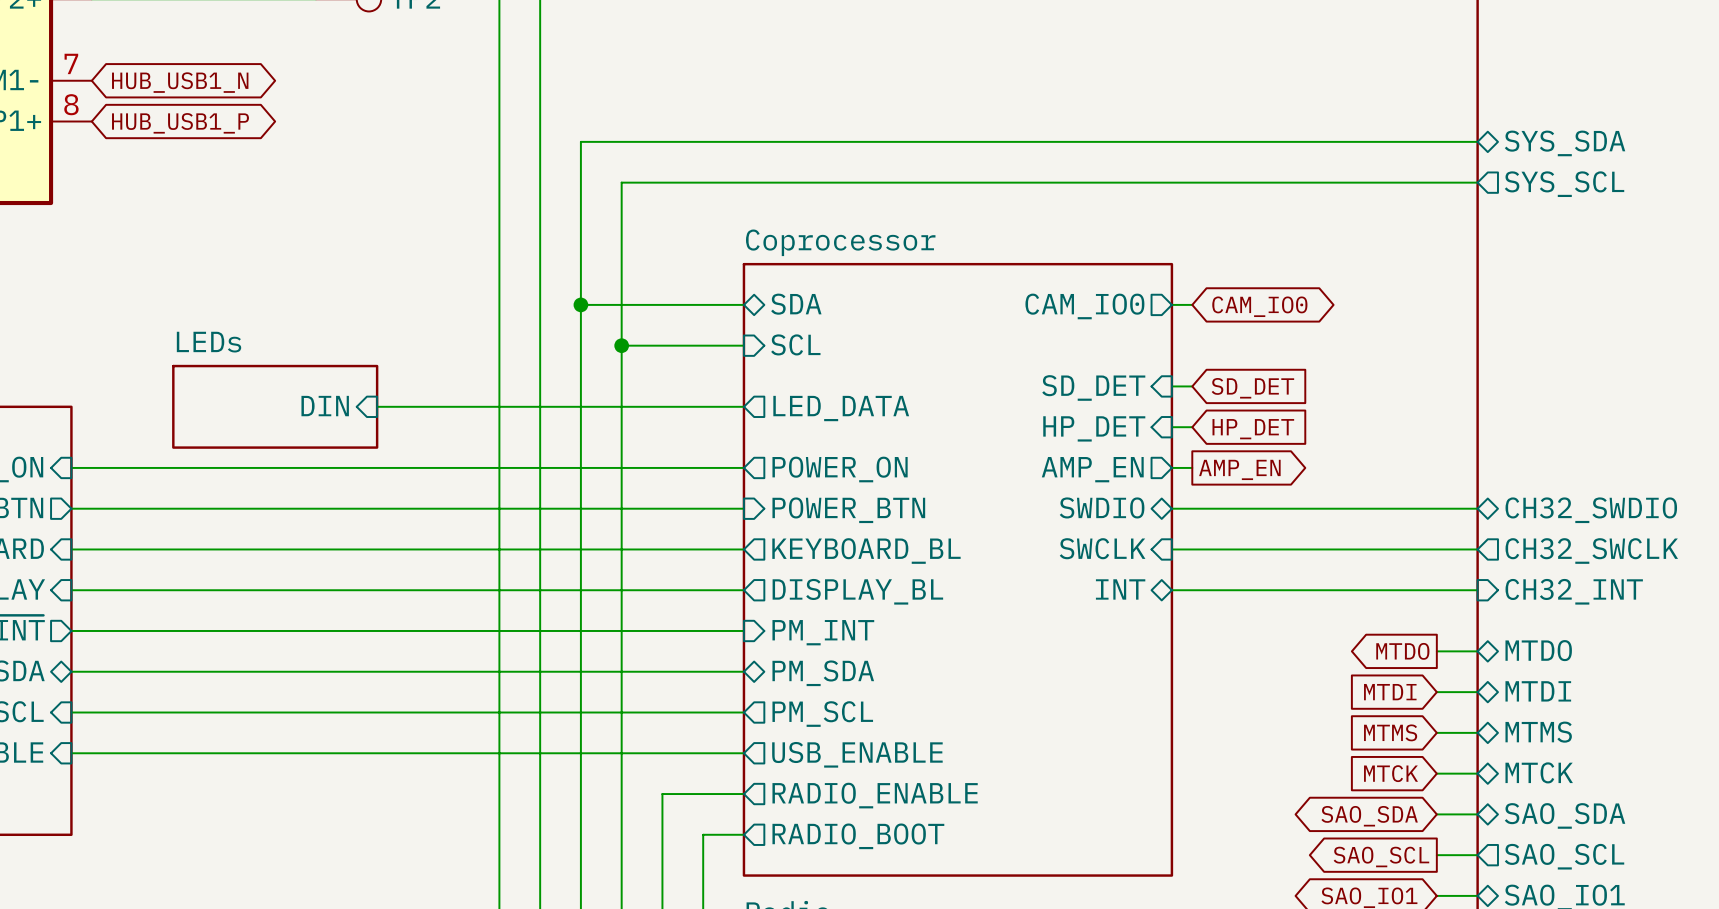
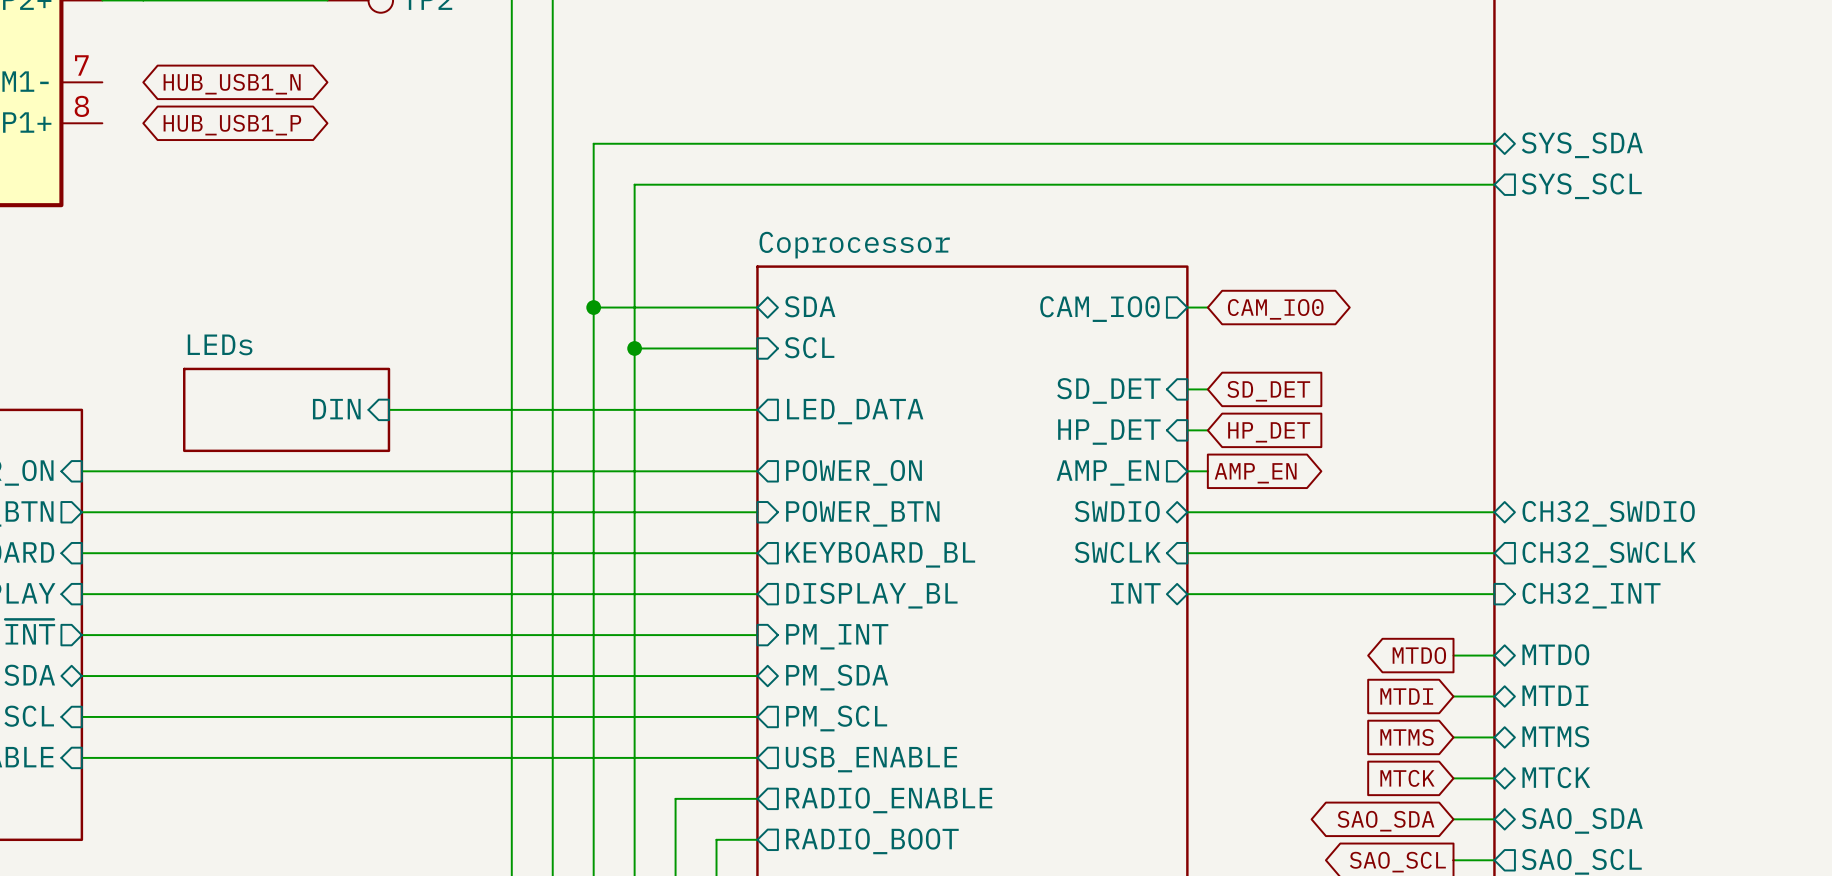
global label position: HUB_USB1_N (180, 82) -> HUB_USB1_N (232, 84)
global label position: HUB_USB1_P (180, 123) -> HUB_USB1_P (232, 125)

